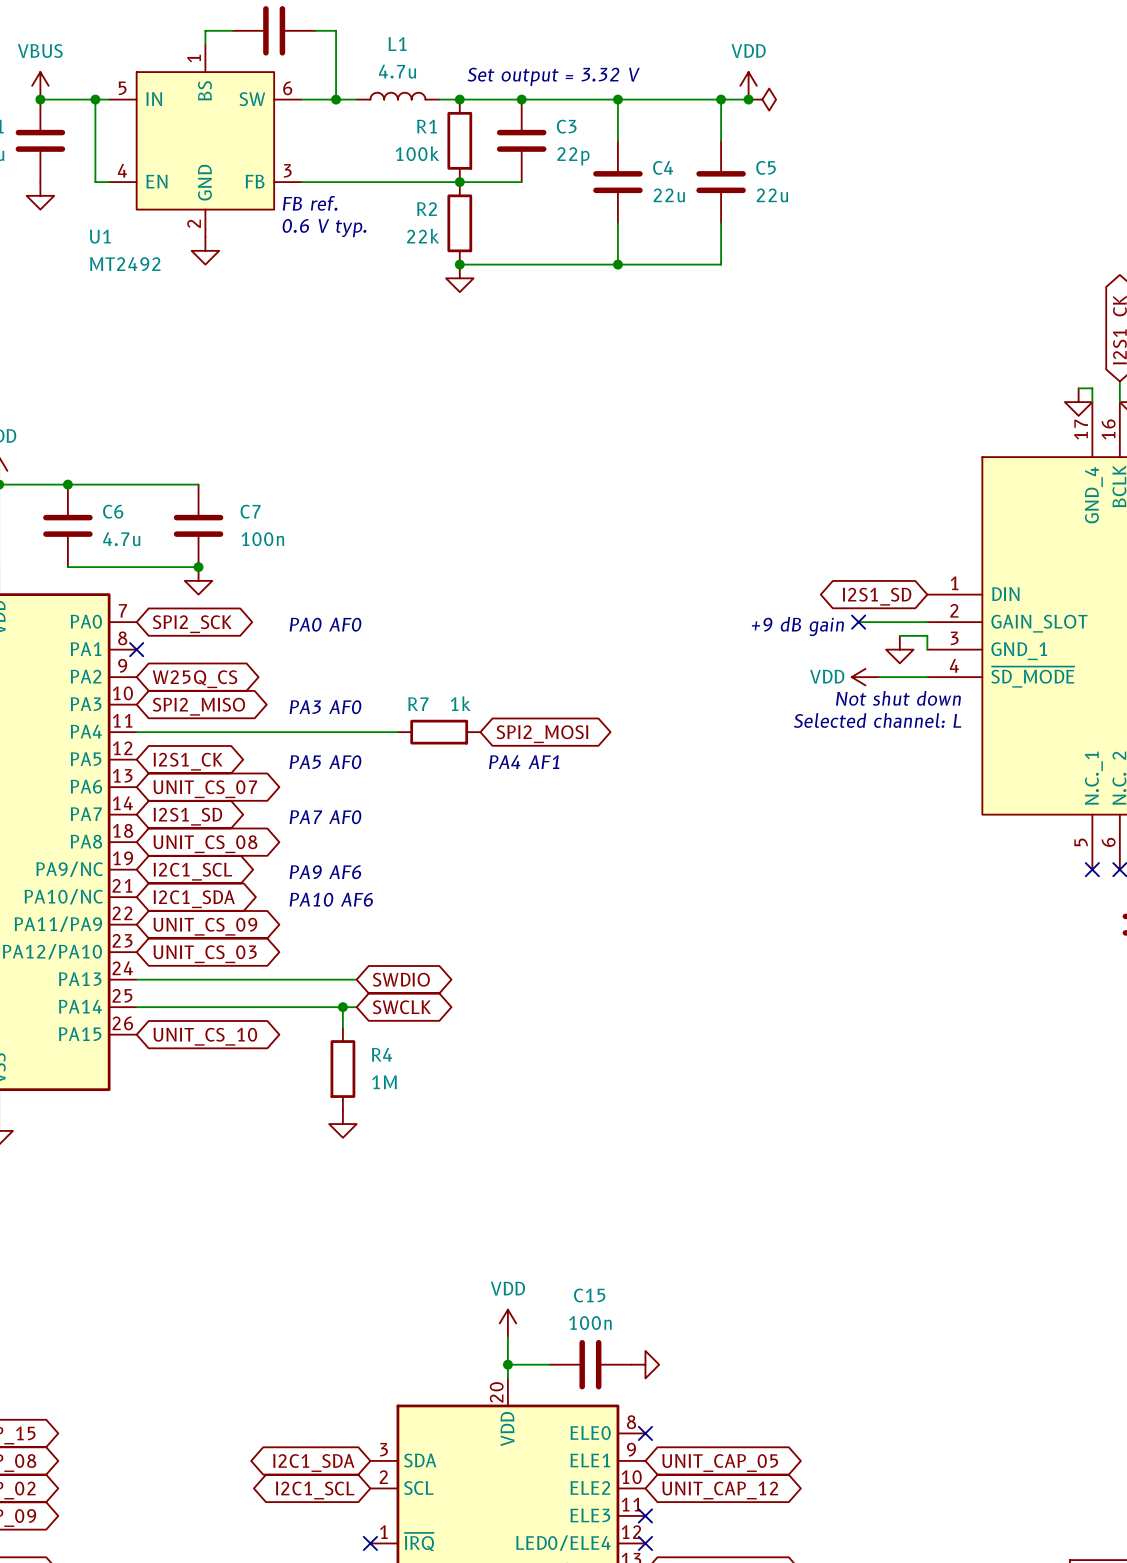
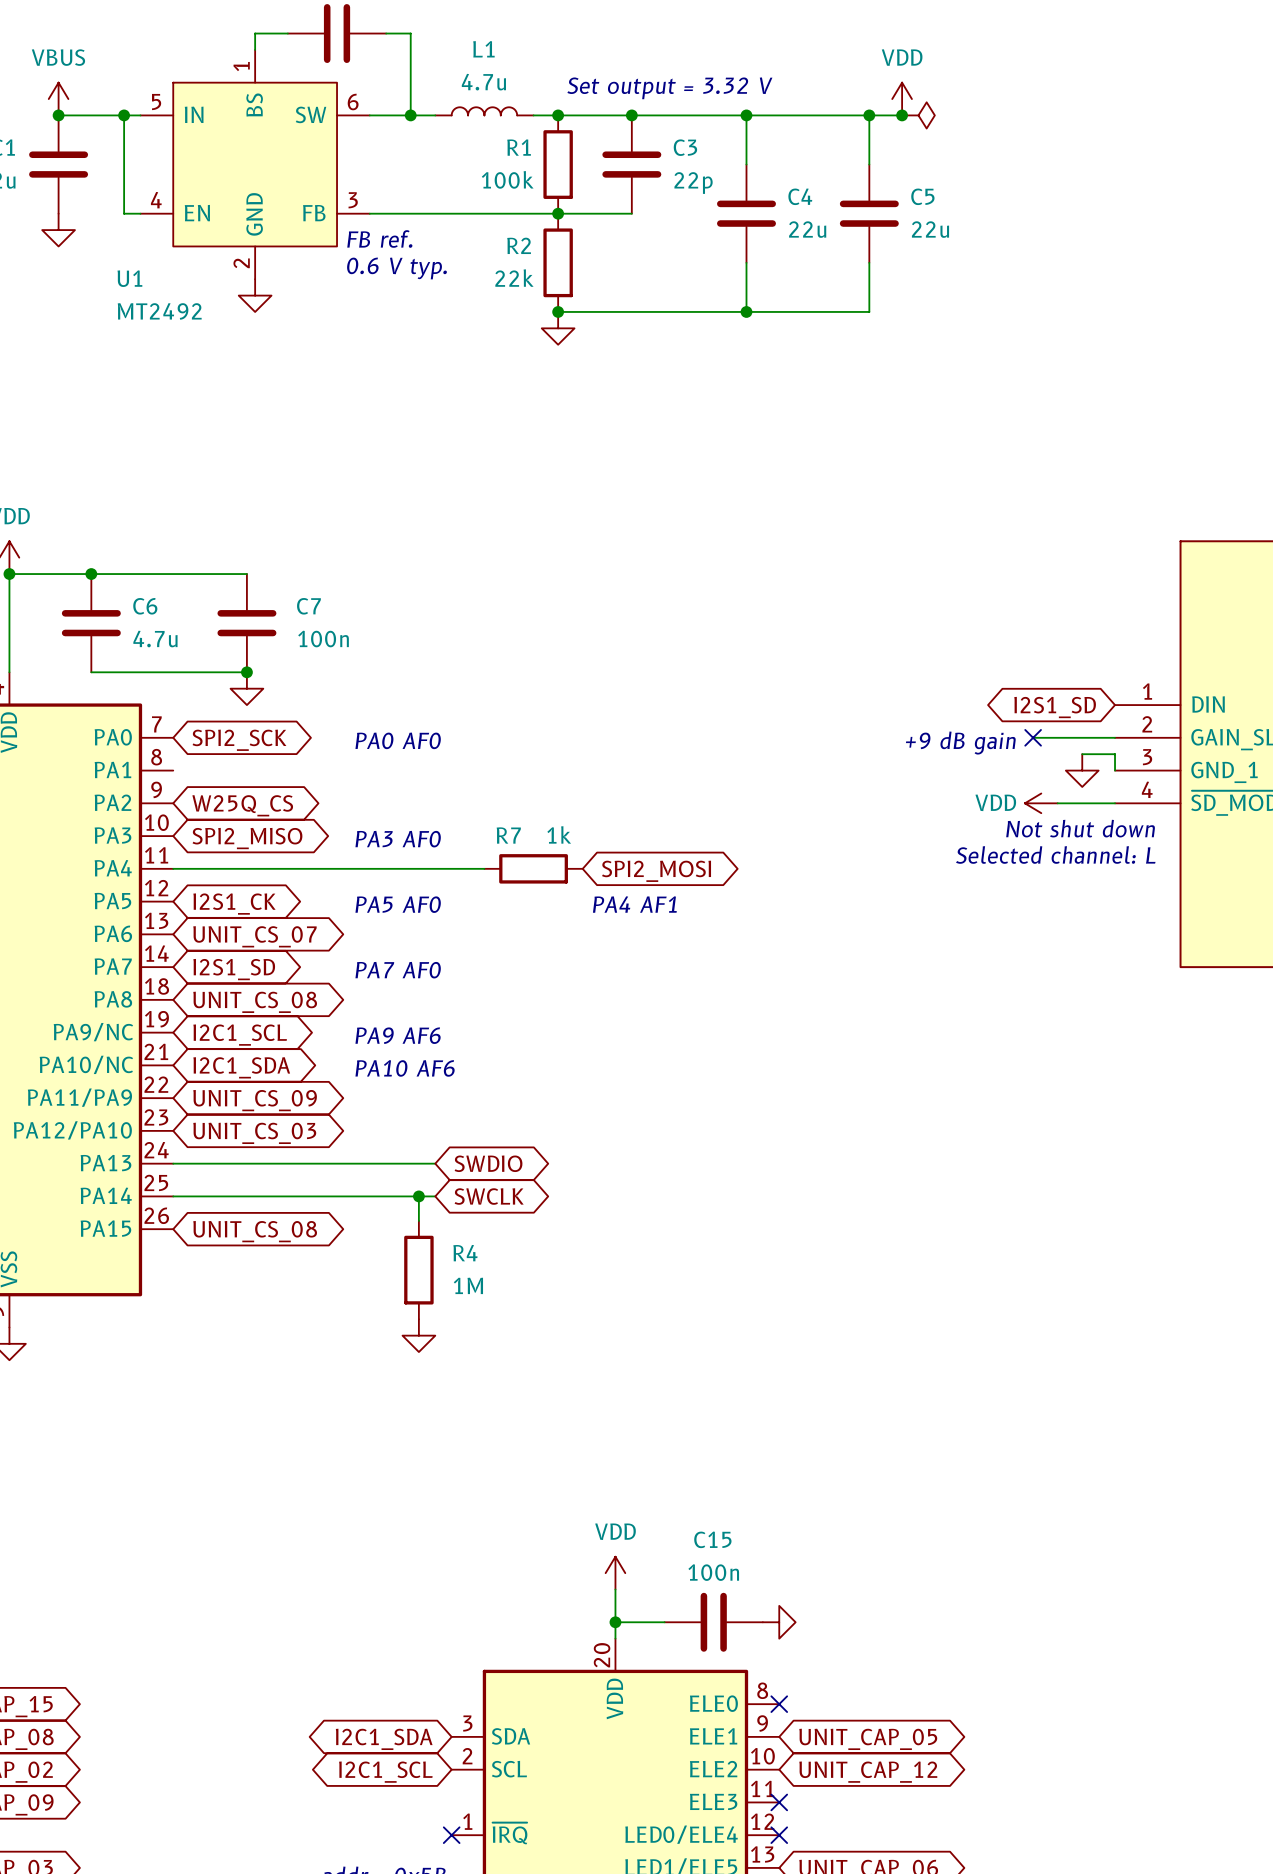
no-connect mark: (136, 649) -> none
global label: UNIT_CS_10 (205, 1036) -> UNIT_CS_08 (255, 1231)

